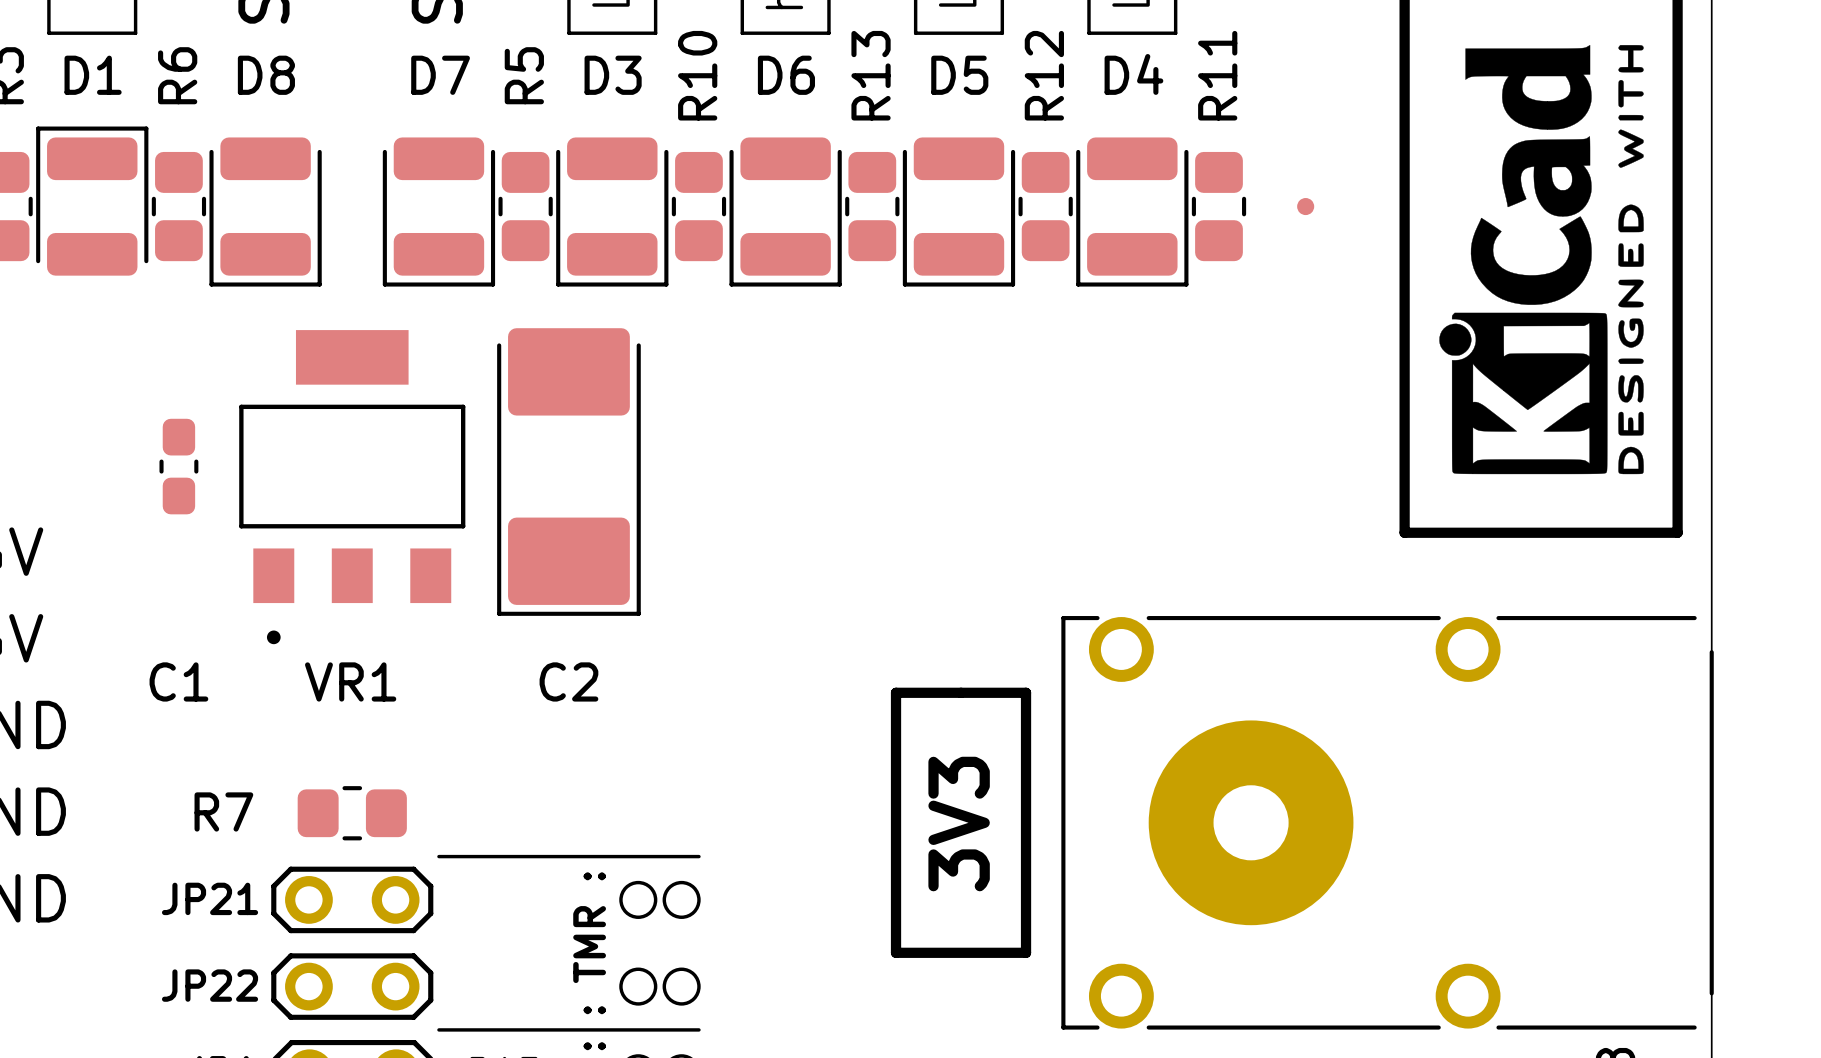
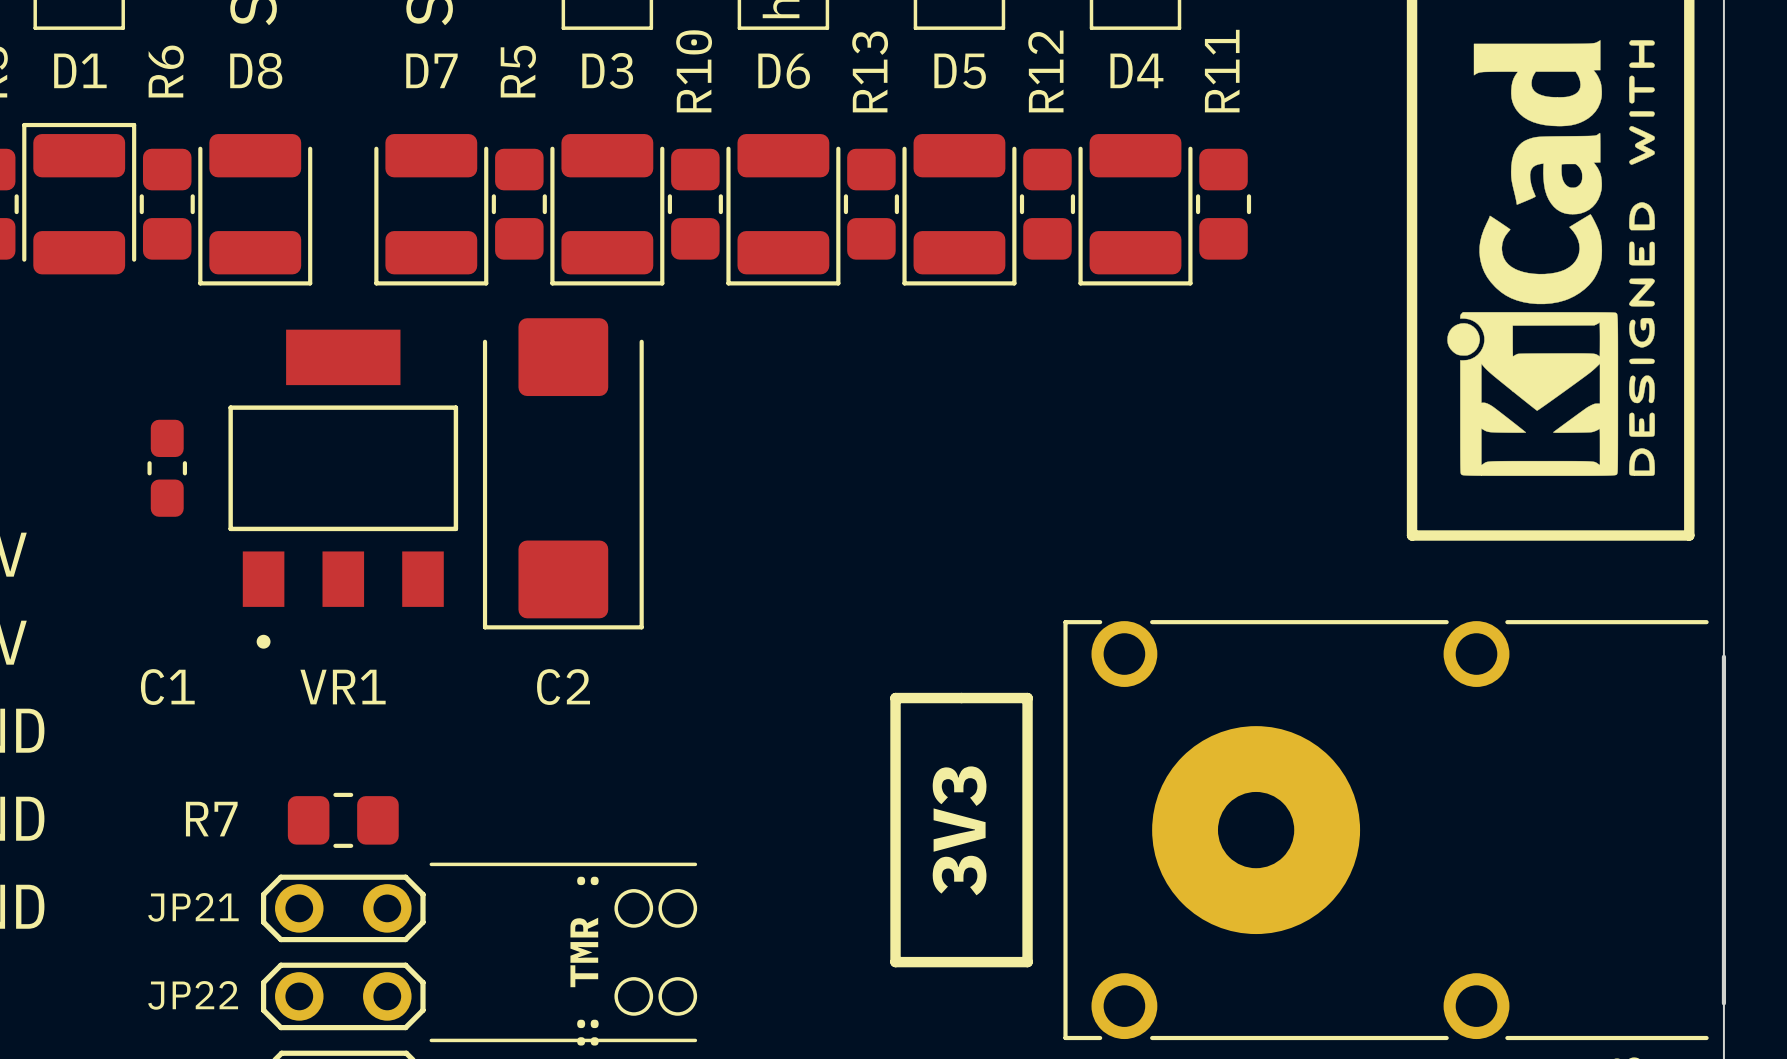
part: (1305, 206) -> none
C2 footprint: [497, 328, 641, 616] -> [482, 318, 644, 630]

